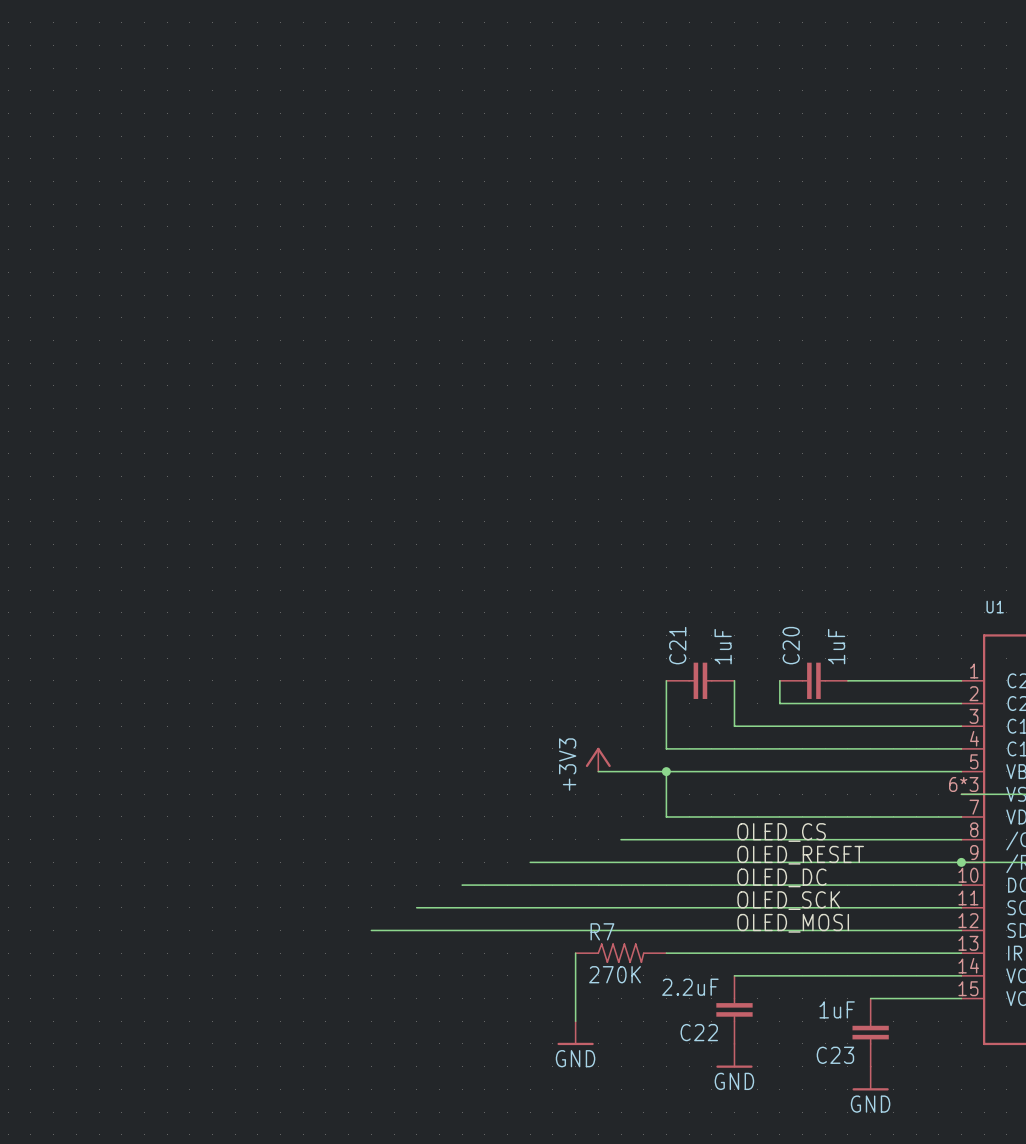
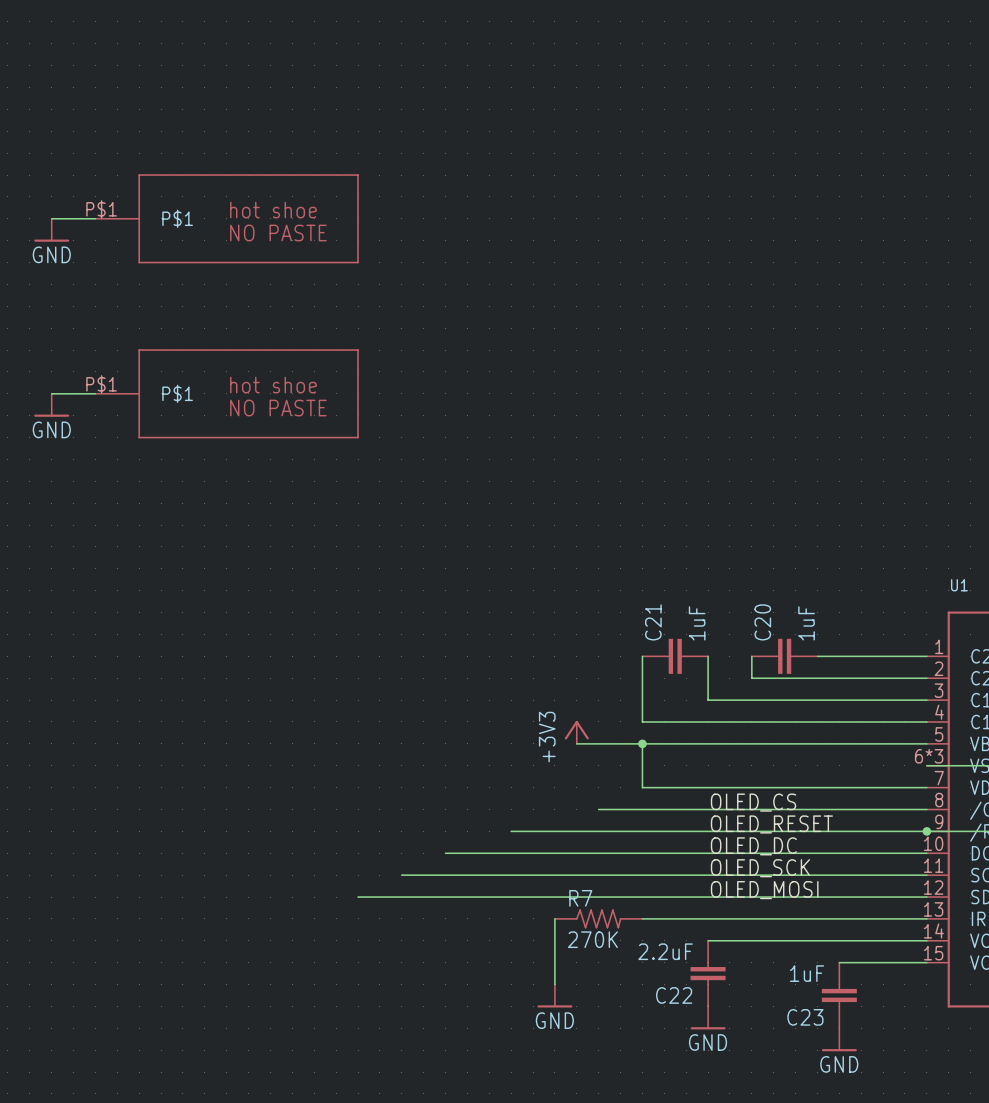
wire: none -> (51, 218) (95, 218)
part: none -> (227, 218)
power symbol: none -> GND (51, 230)
wire: none -> (51, 393) (95, 393)
part: none -> (227, 393)
power symbol: none -> GND (51, 405)

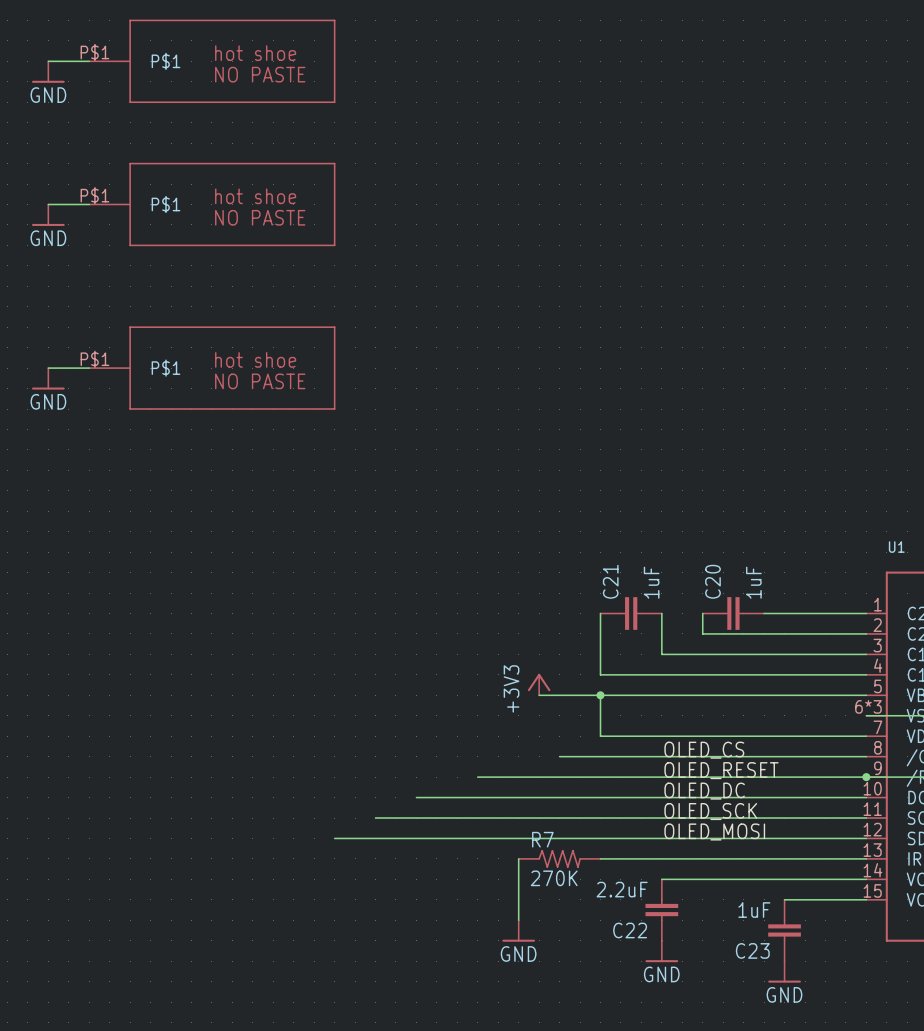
wire: none -> (48, 61) (89, 61)
part: none -> (212, 61)
power symbol: none -> GND (48, 72)

